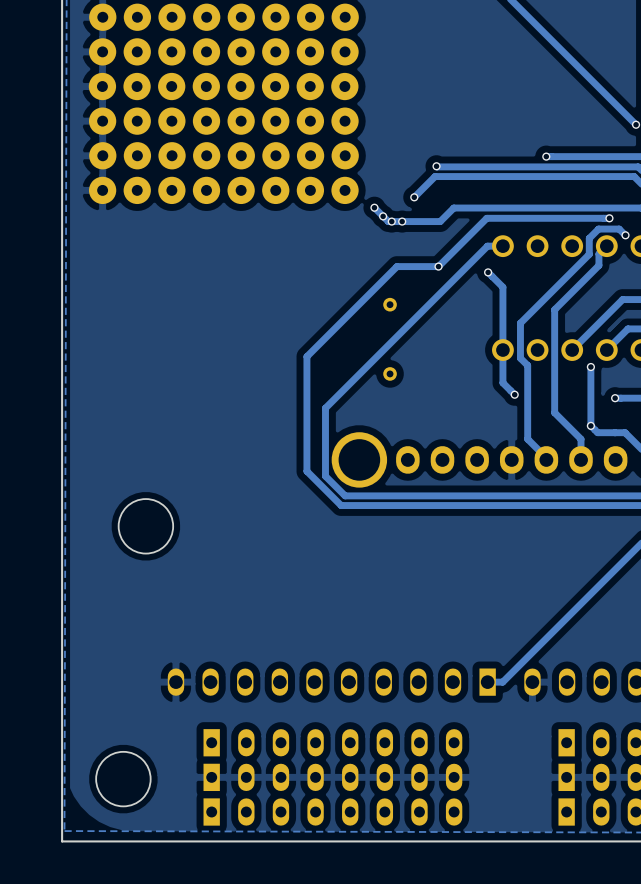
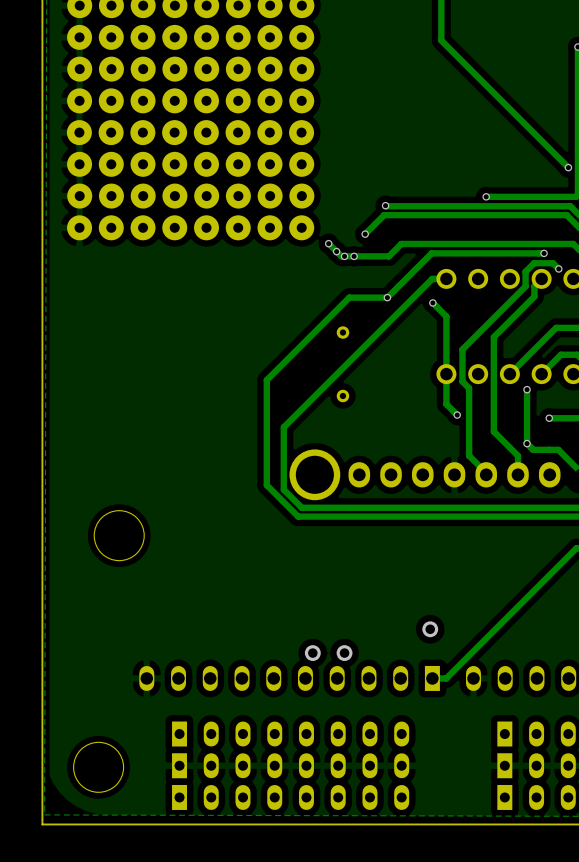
via: none -> (430, 629)
via: none -> (312, 653)
via: none -> (344, 653)

